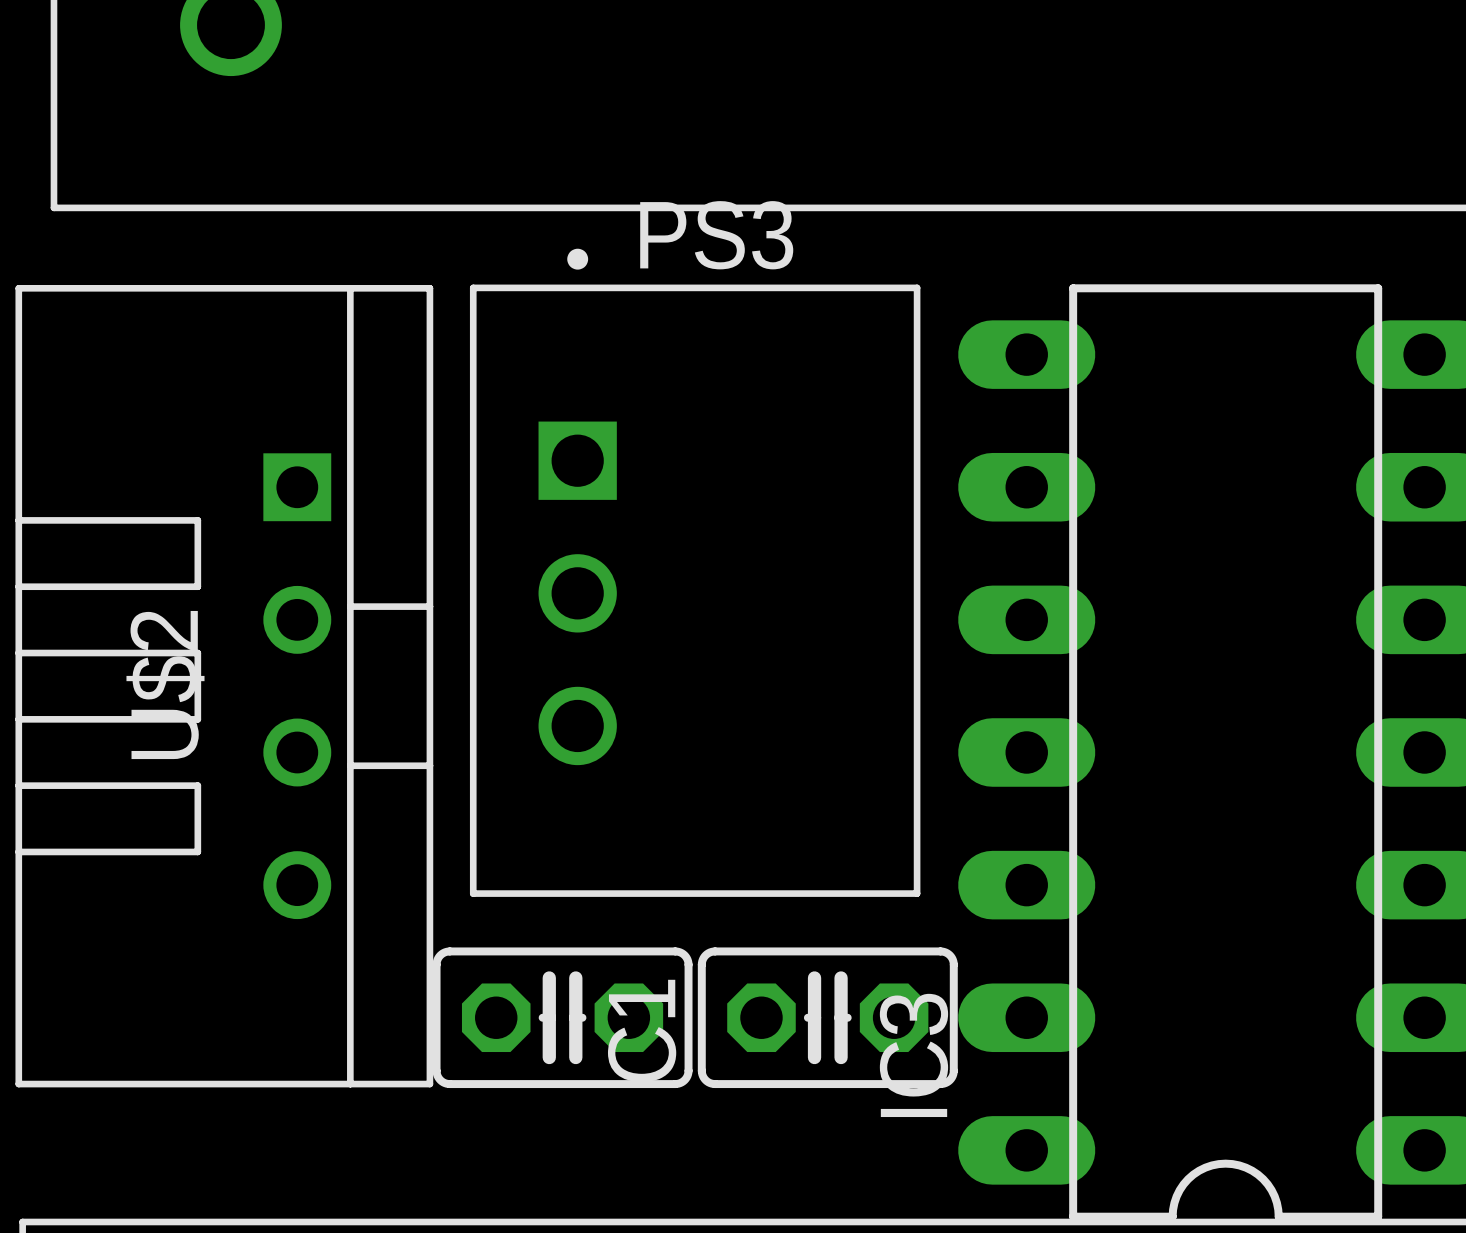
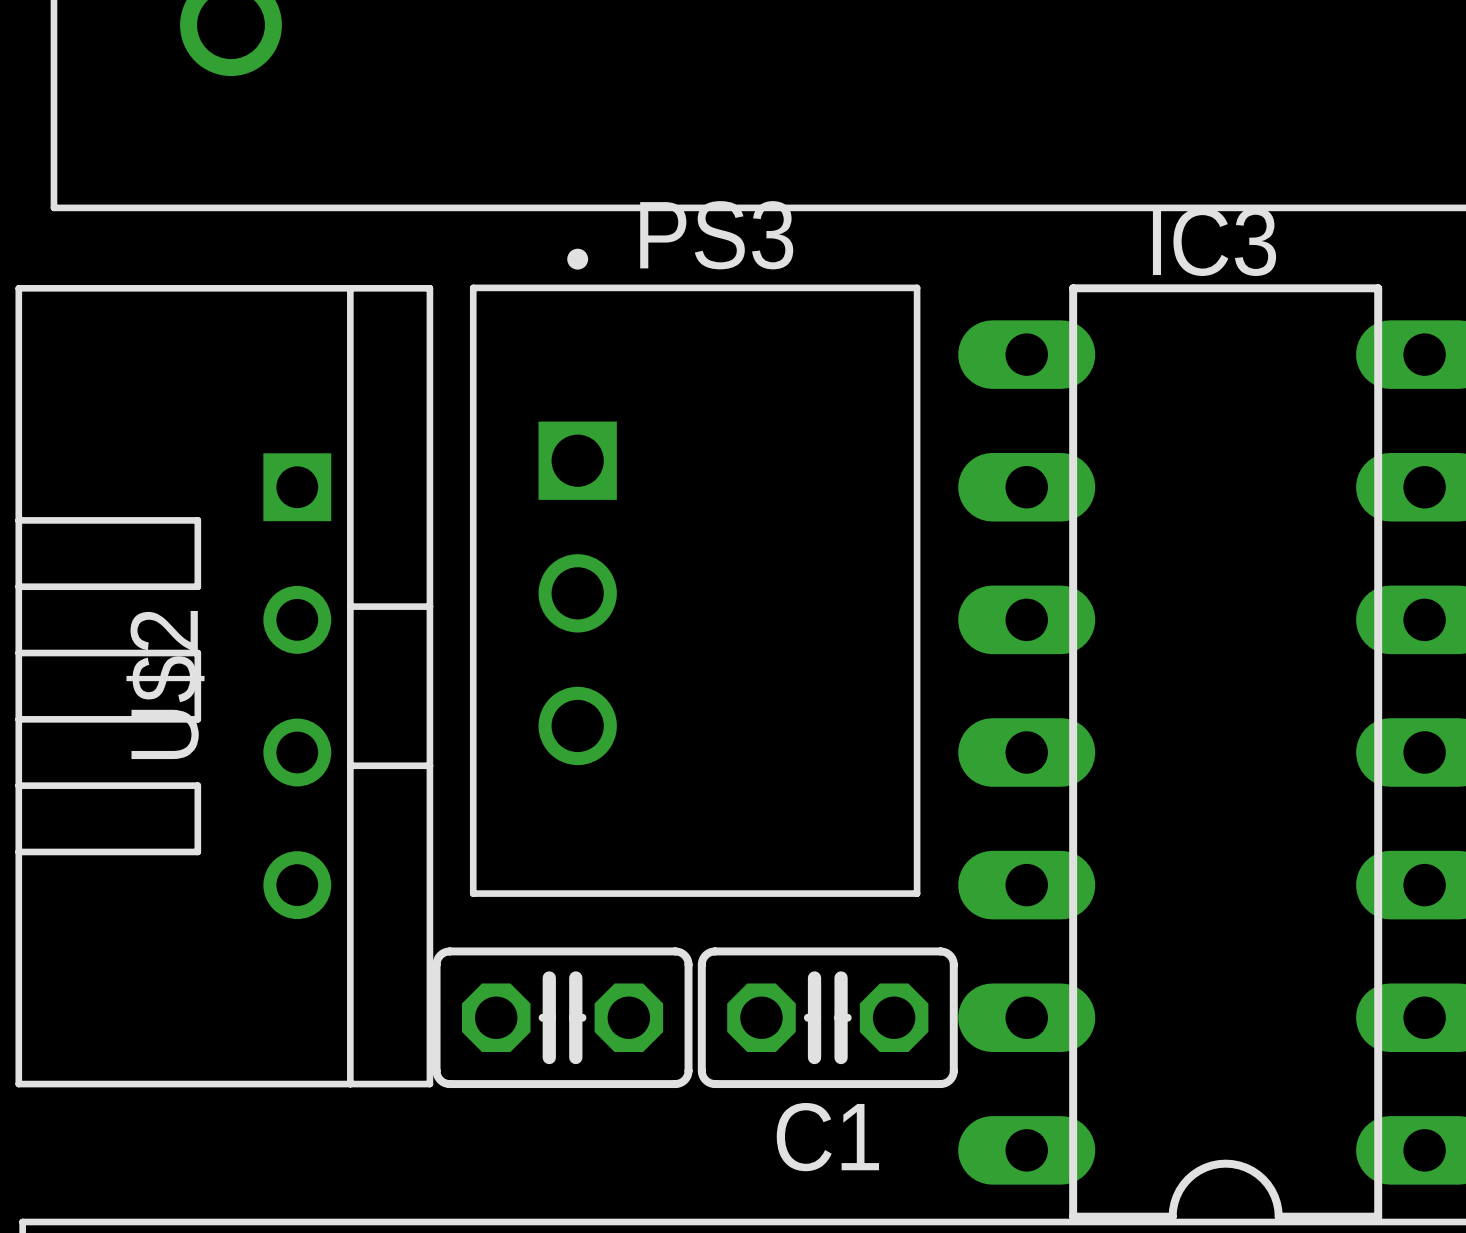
C1 name rotation: 0° (642, 1030) -> 90° clockwise (827, 1137)
C1 name position: C1 (642, 1030) -> C1 (827, 1137)
IC3 name rotation: 0° (913, 1055) -> 90° clockwise (1214, 241)
IC3 name position: IC3 (913, 1055) -> IC3 (1214, 241)

